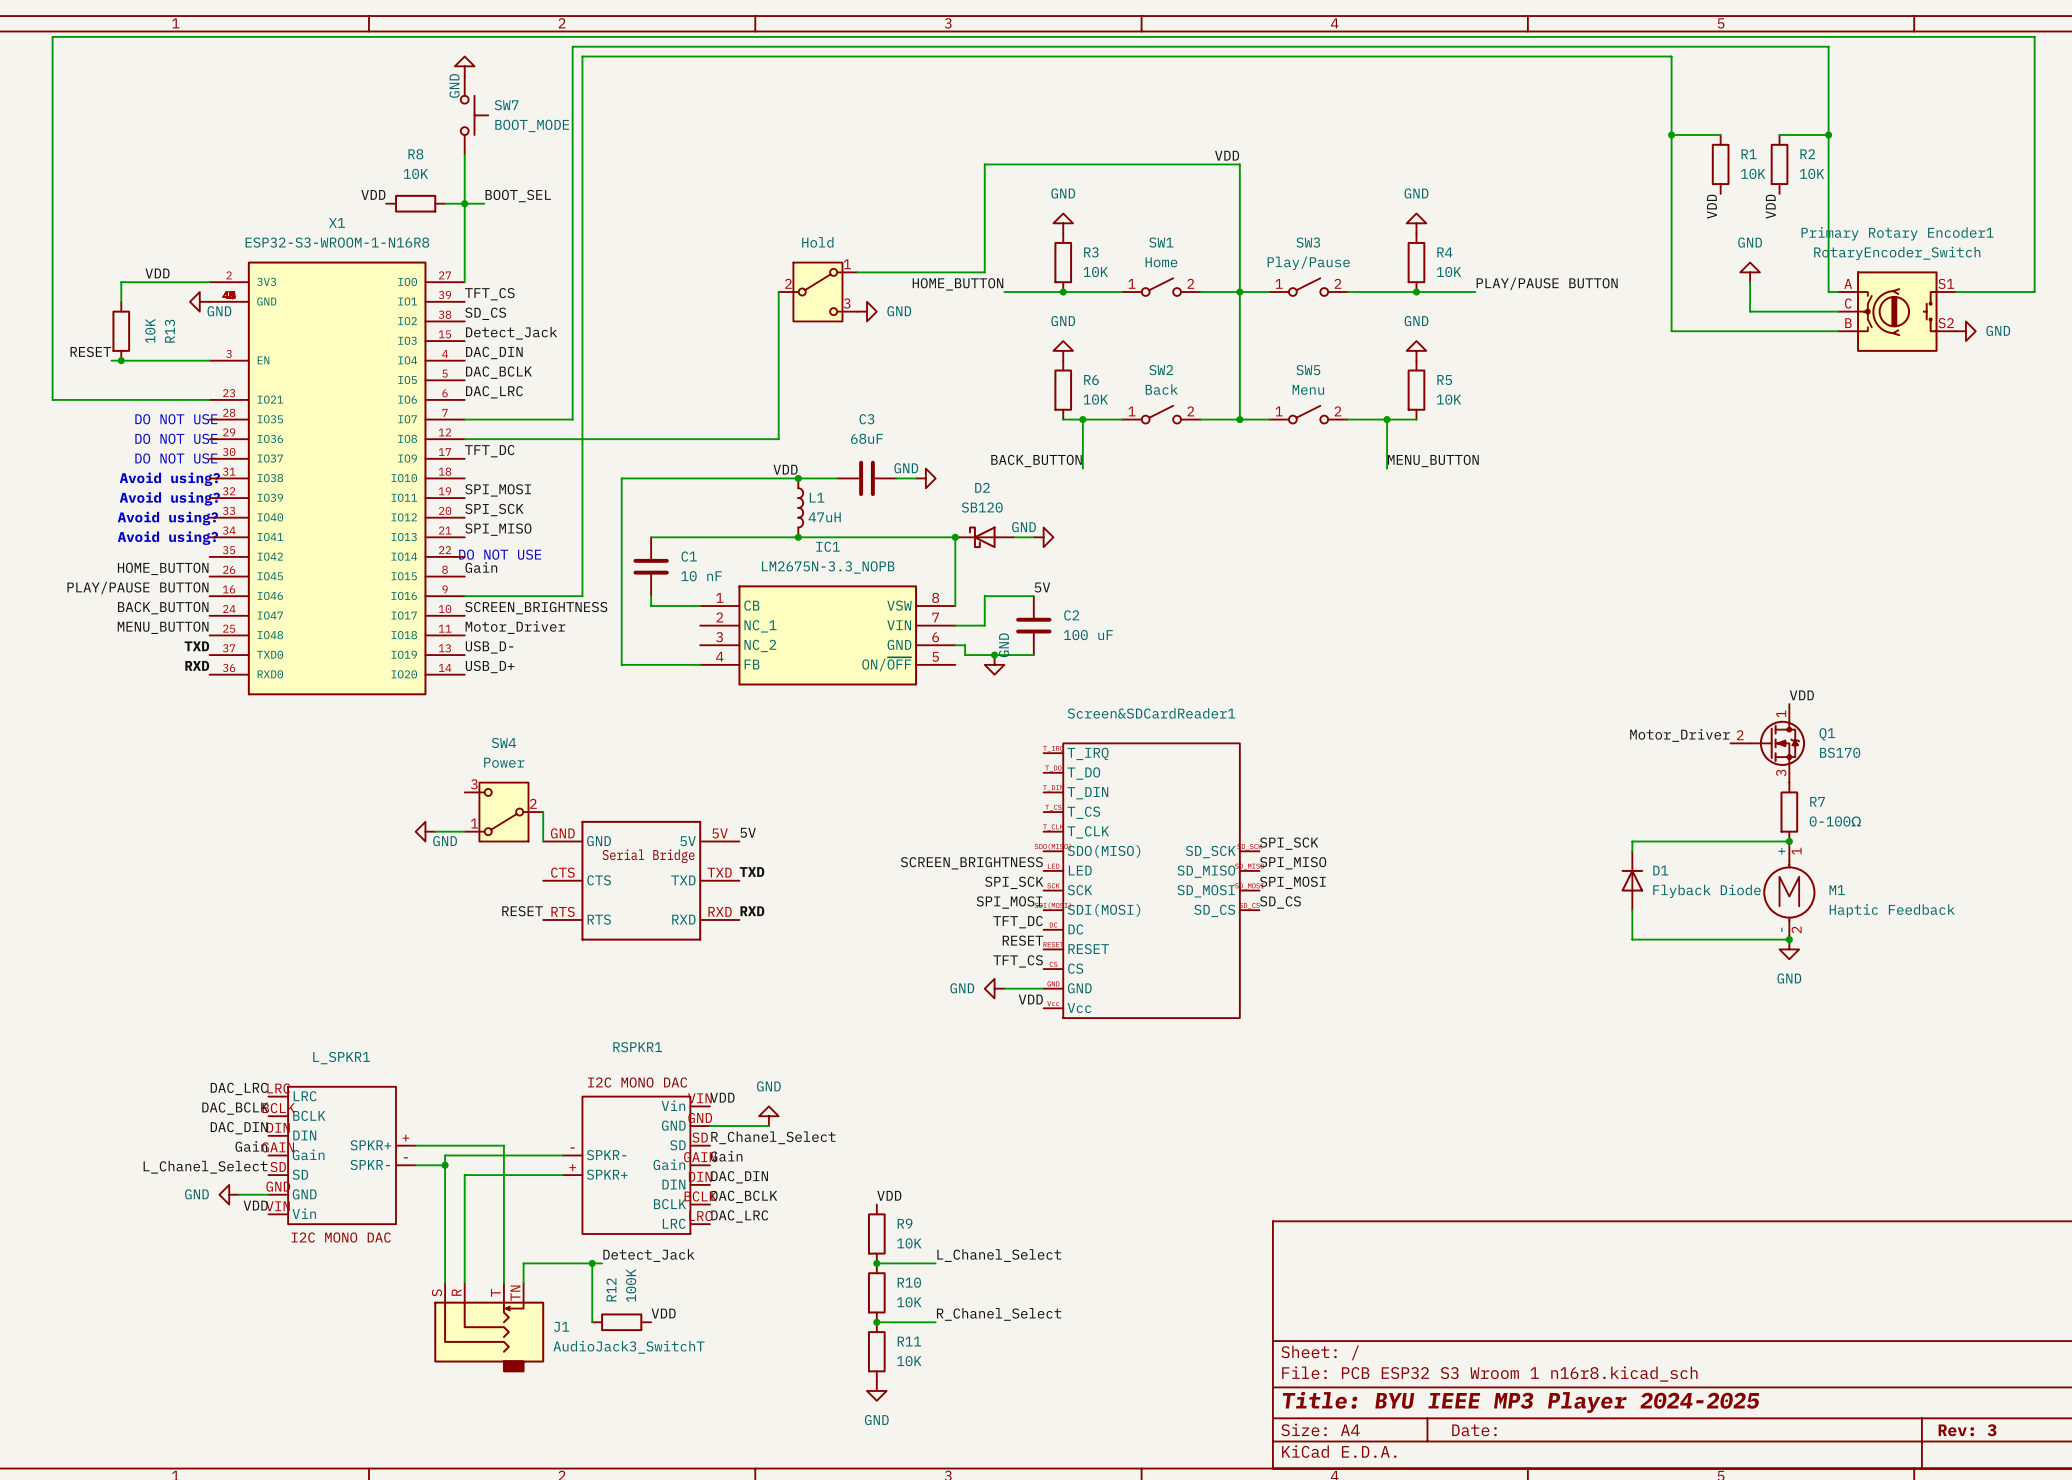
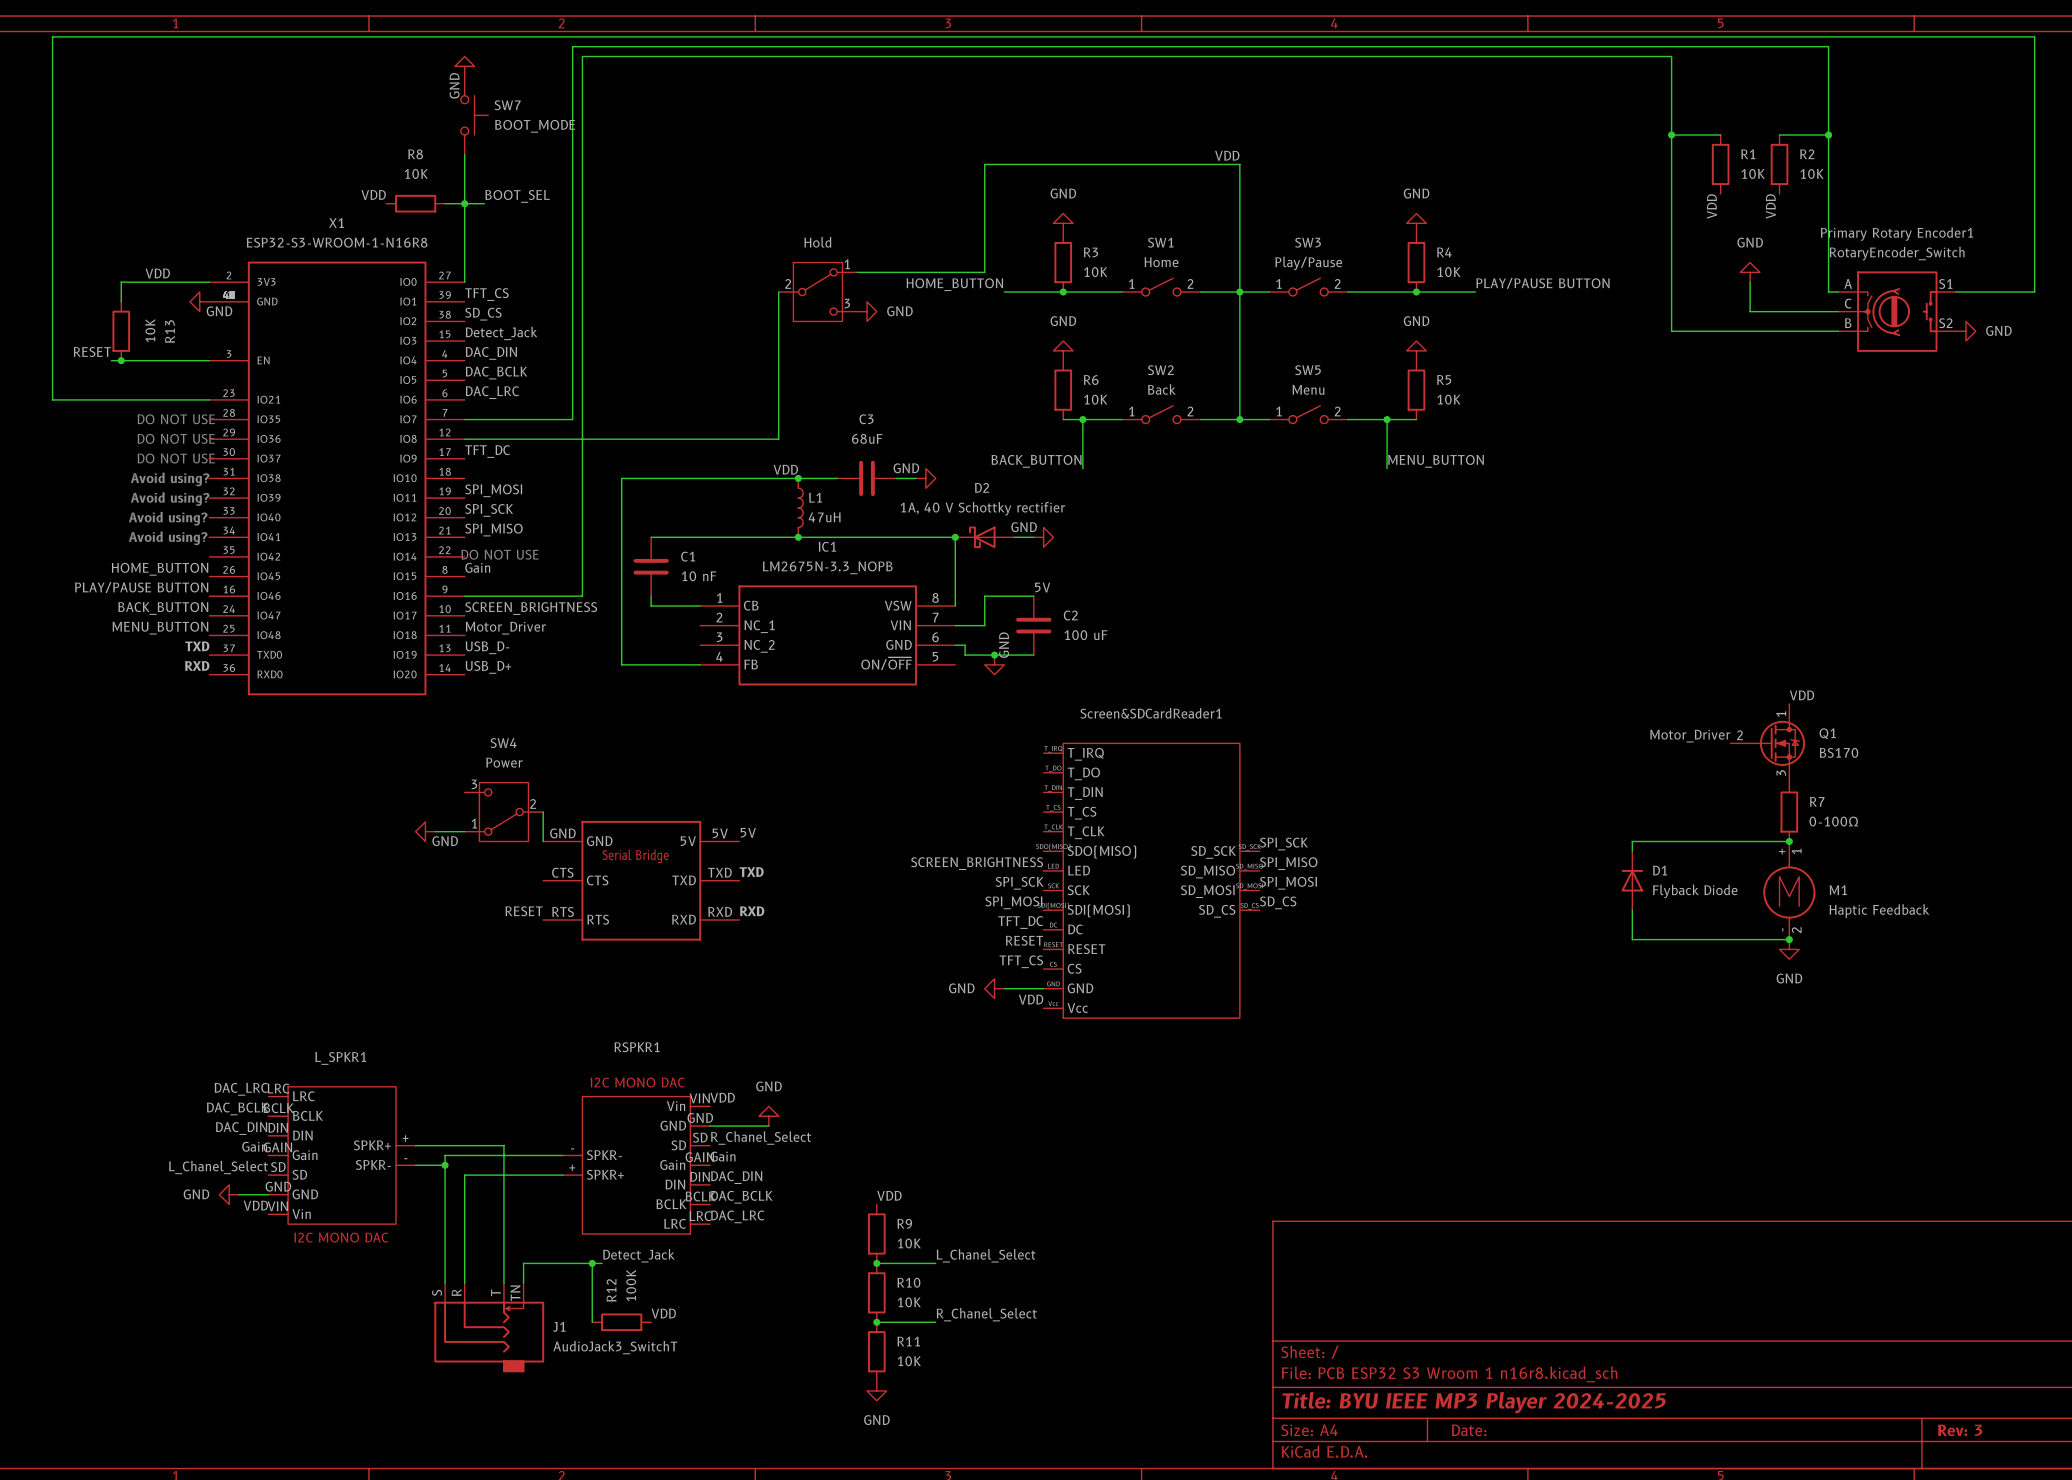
D2 value: SB120 (982, 507) -> 1A, 40 V Schottky rectifier (982, 508)

